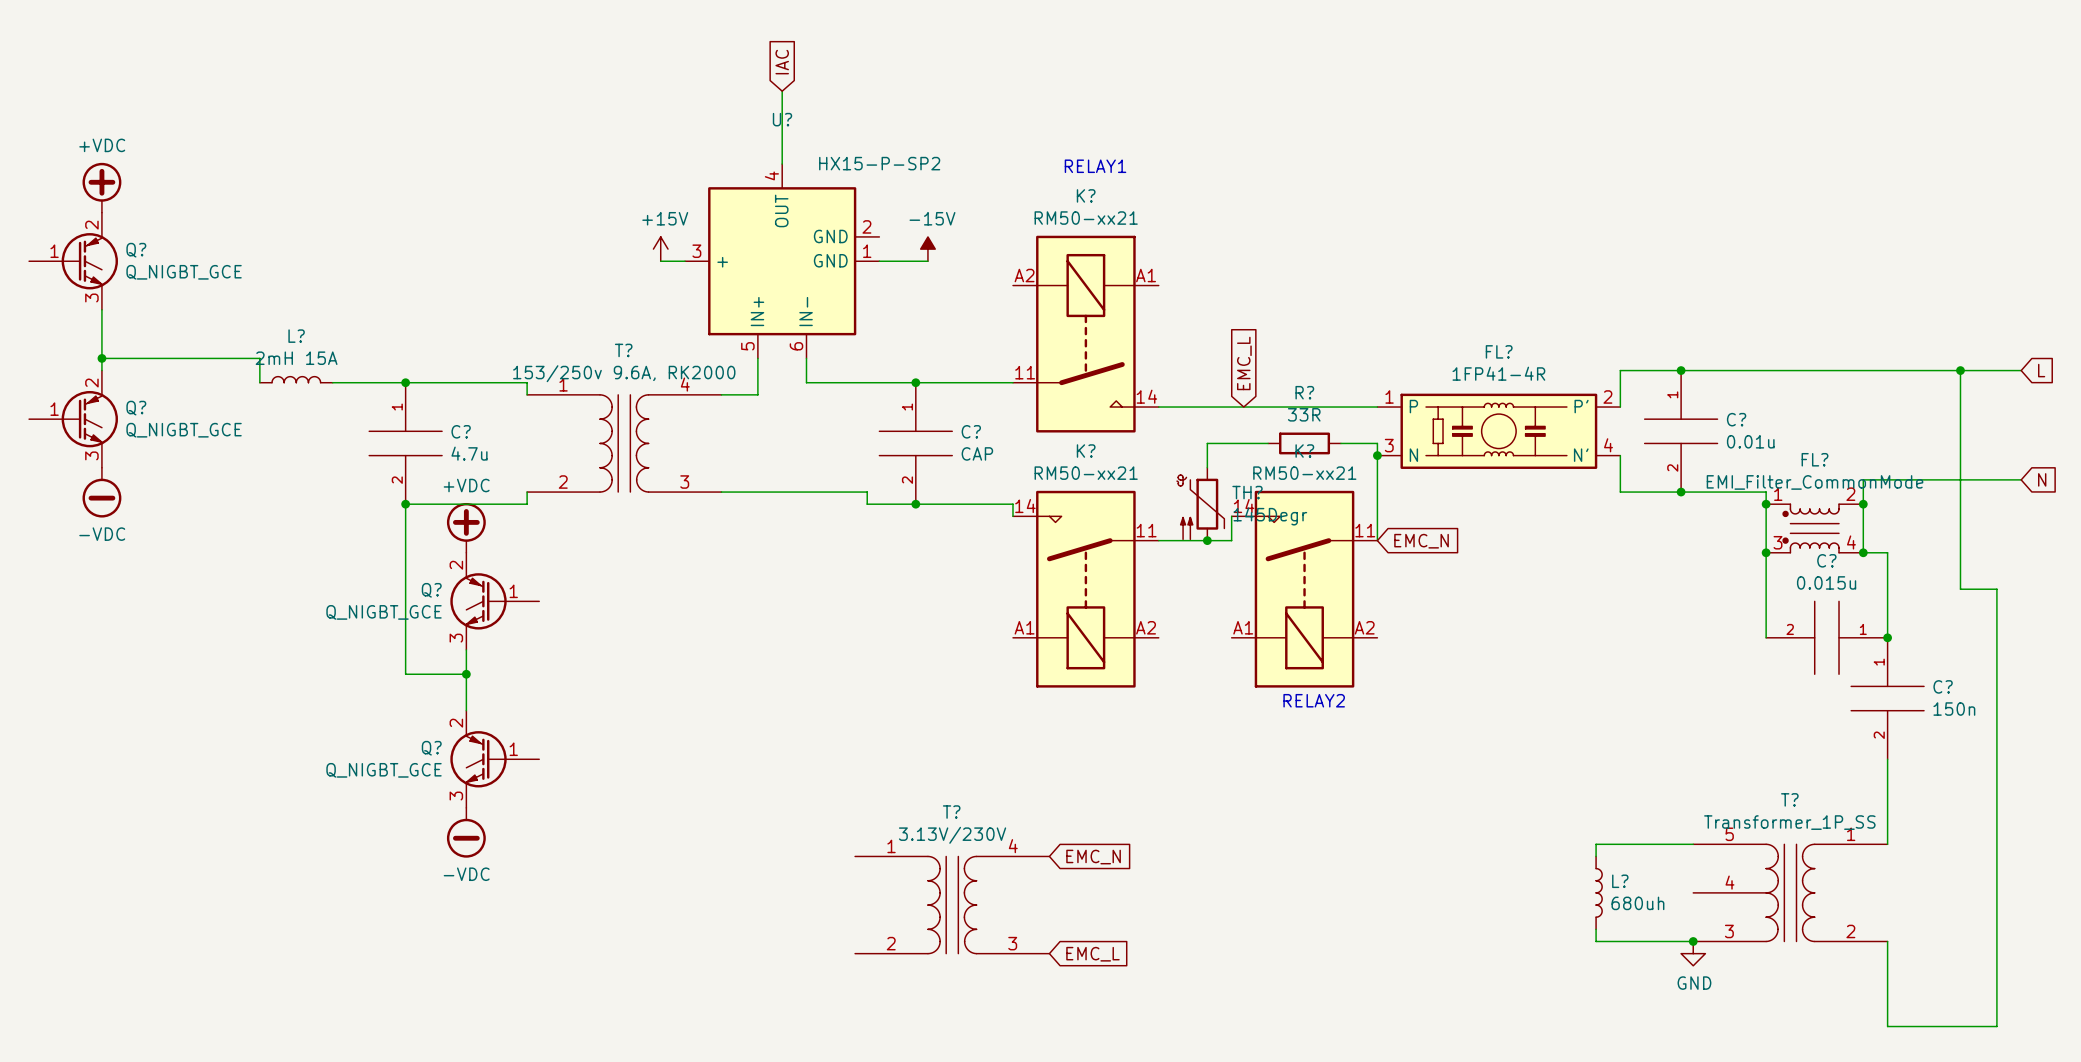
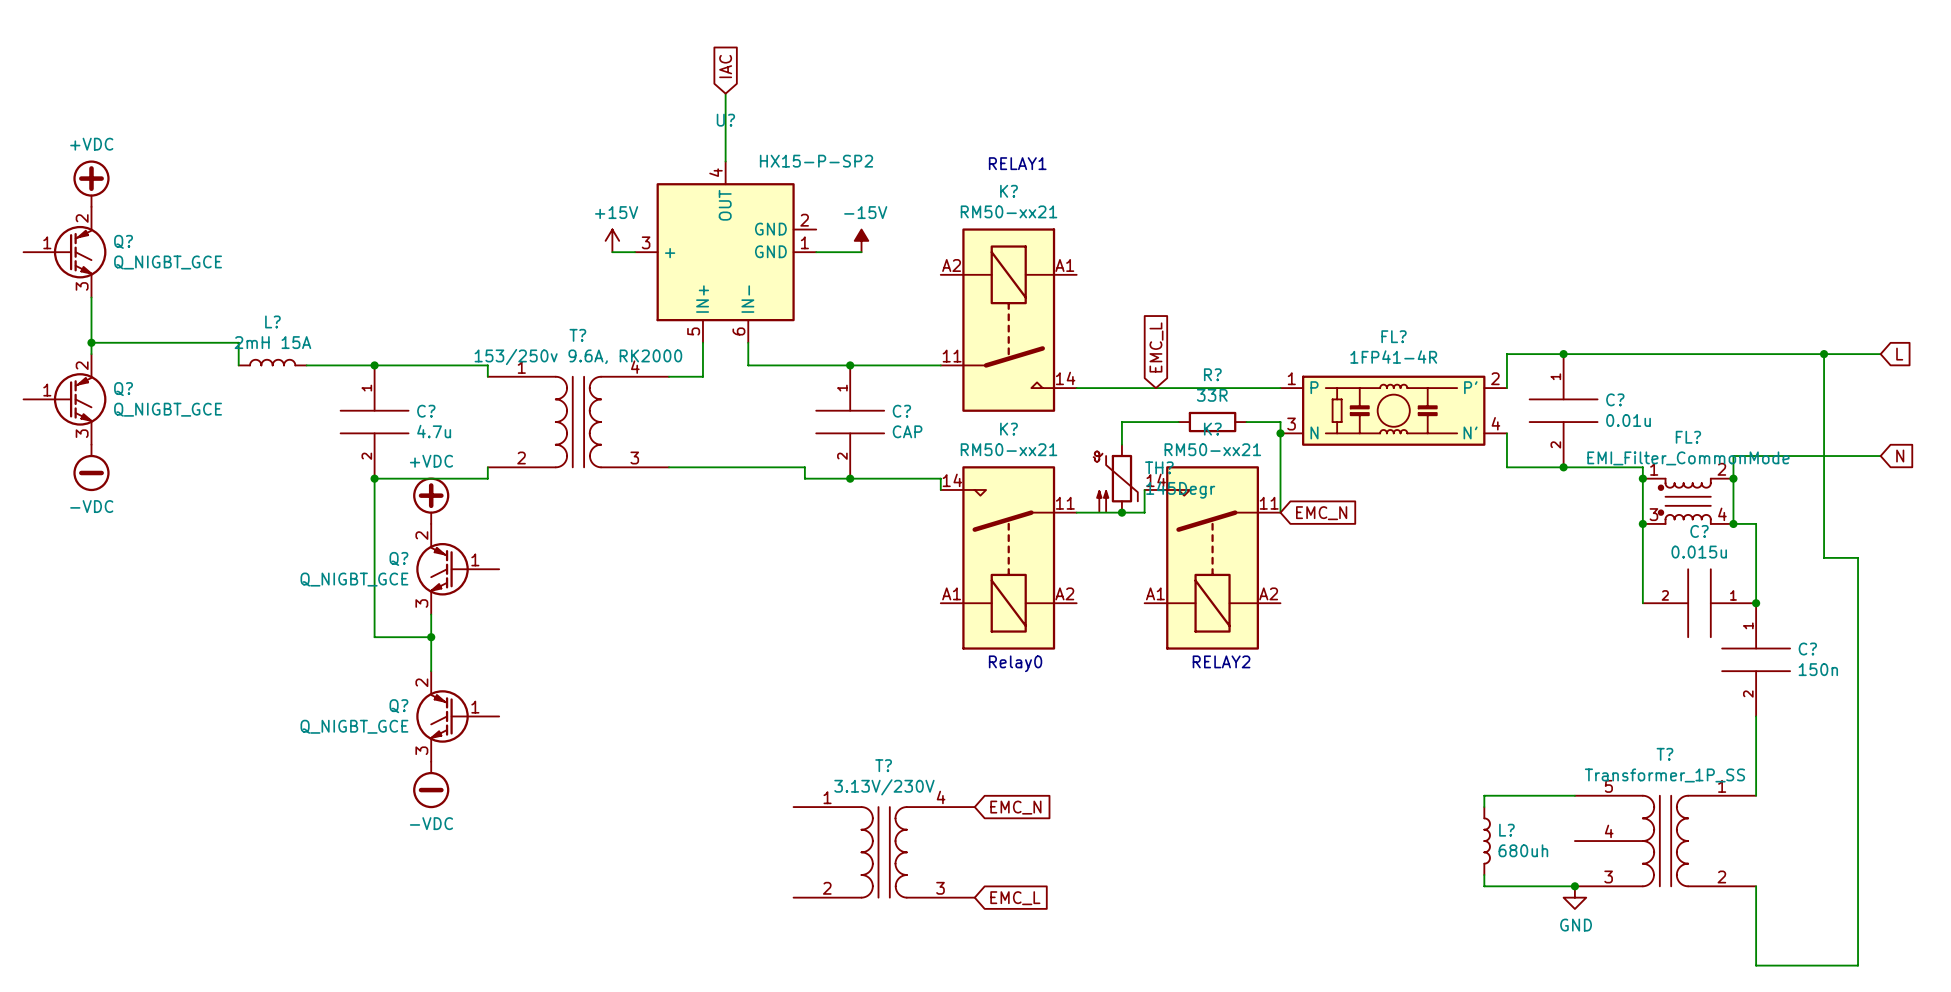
text: none -> Relay0 (1015, 663)

